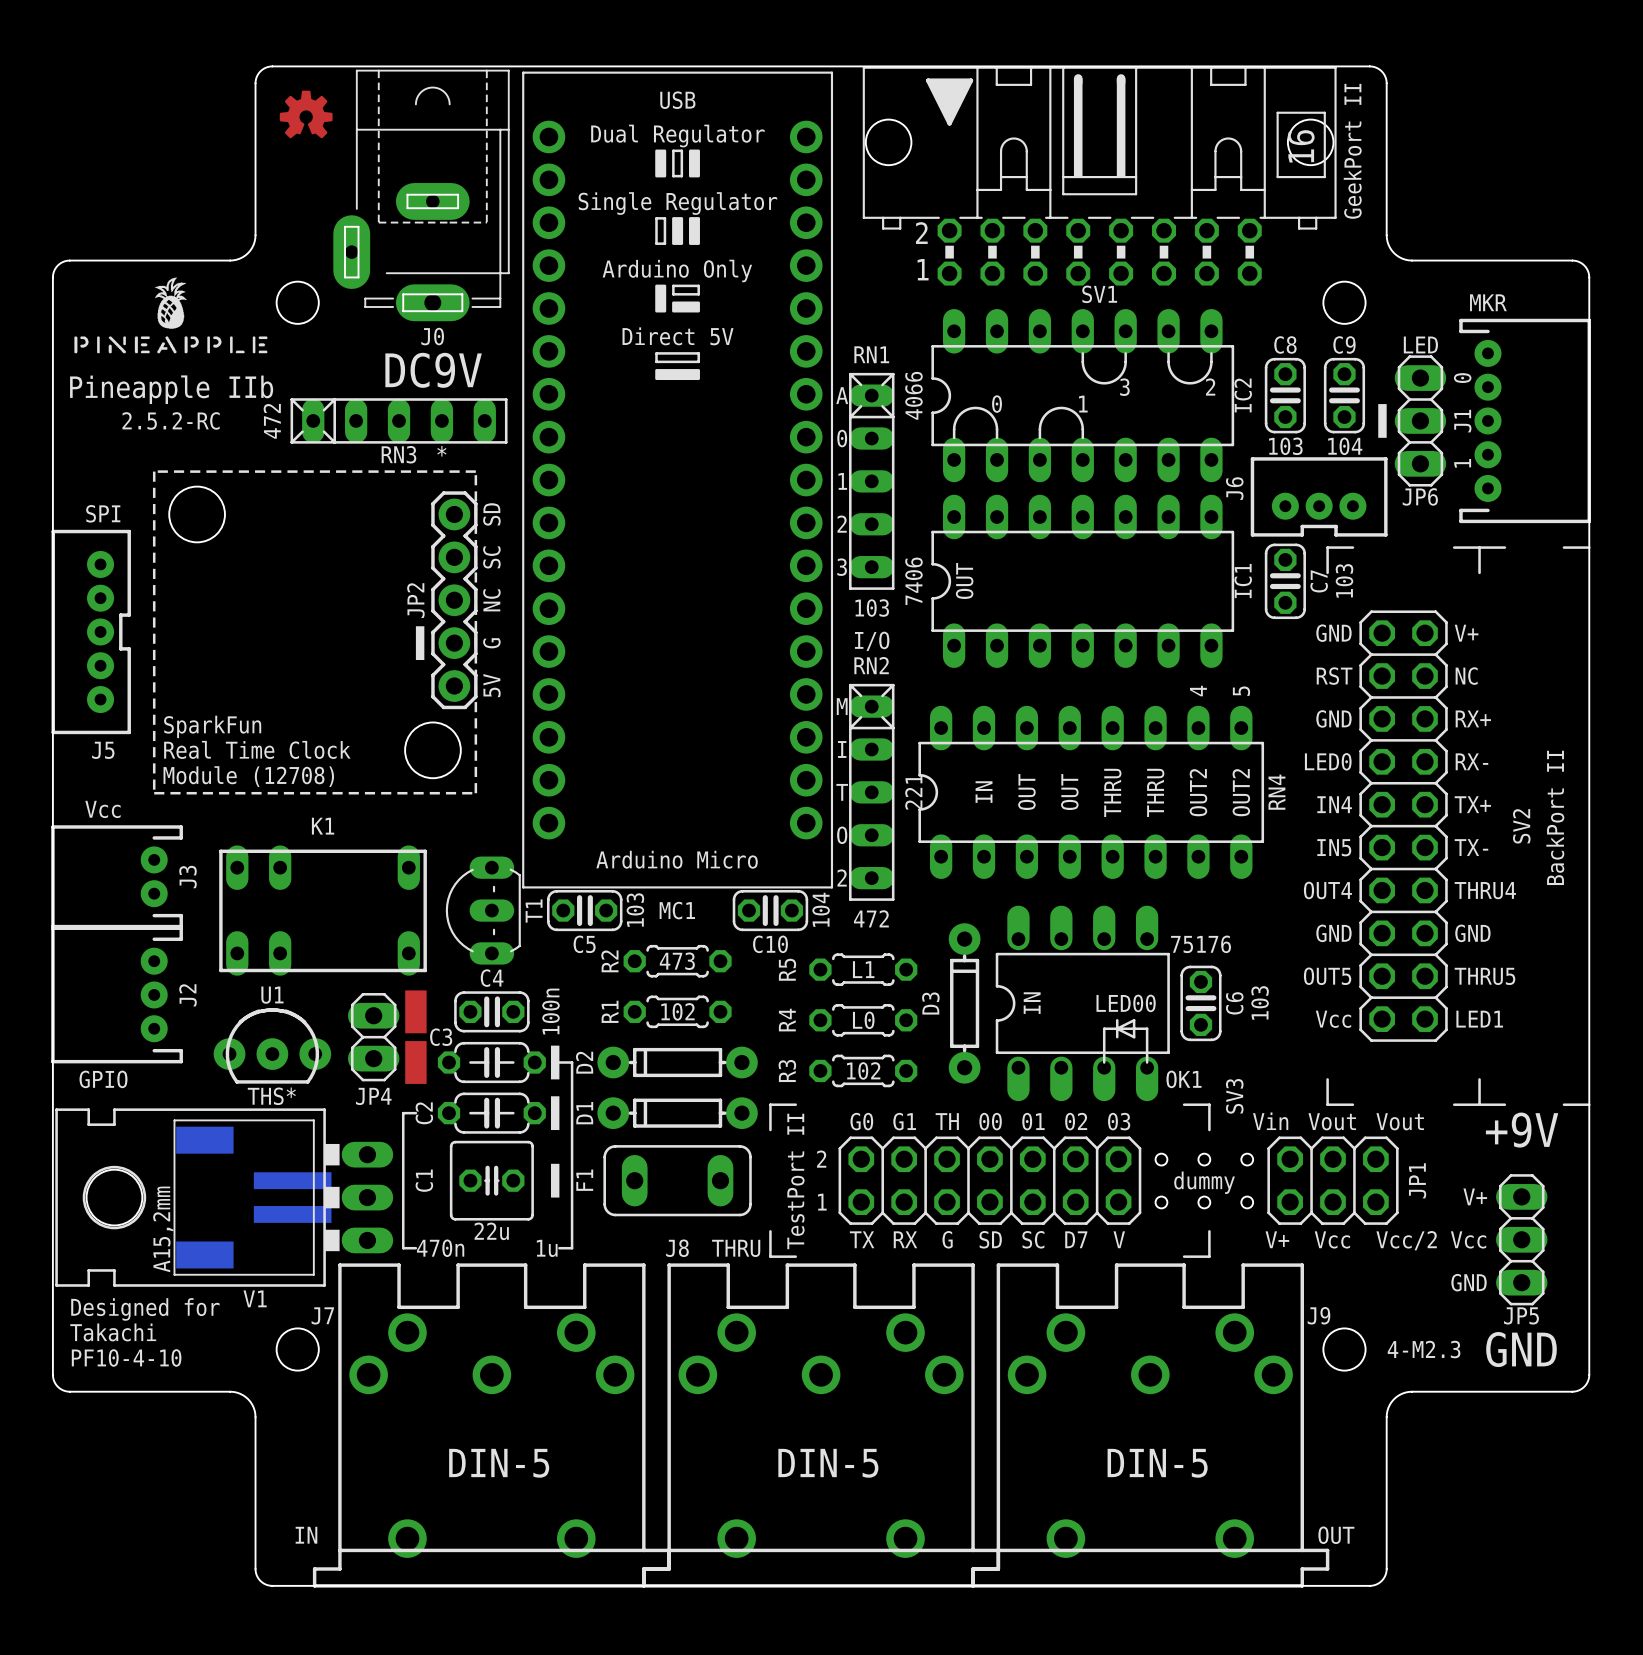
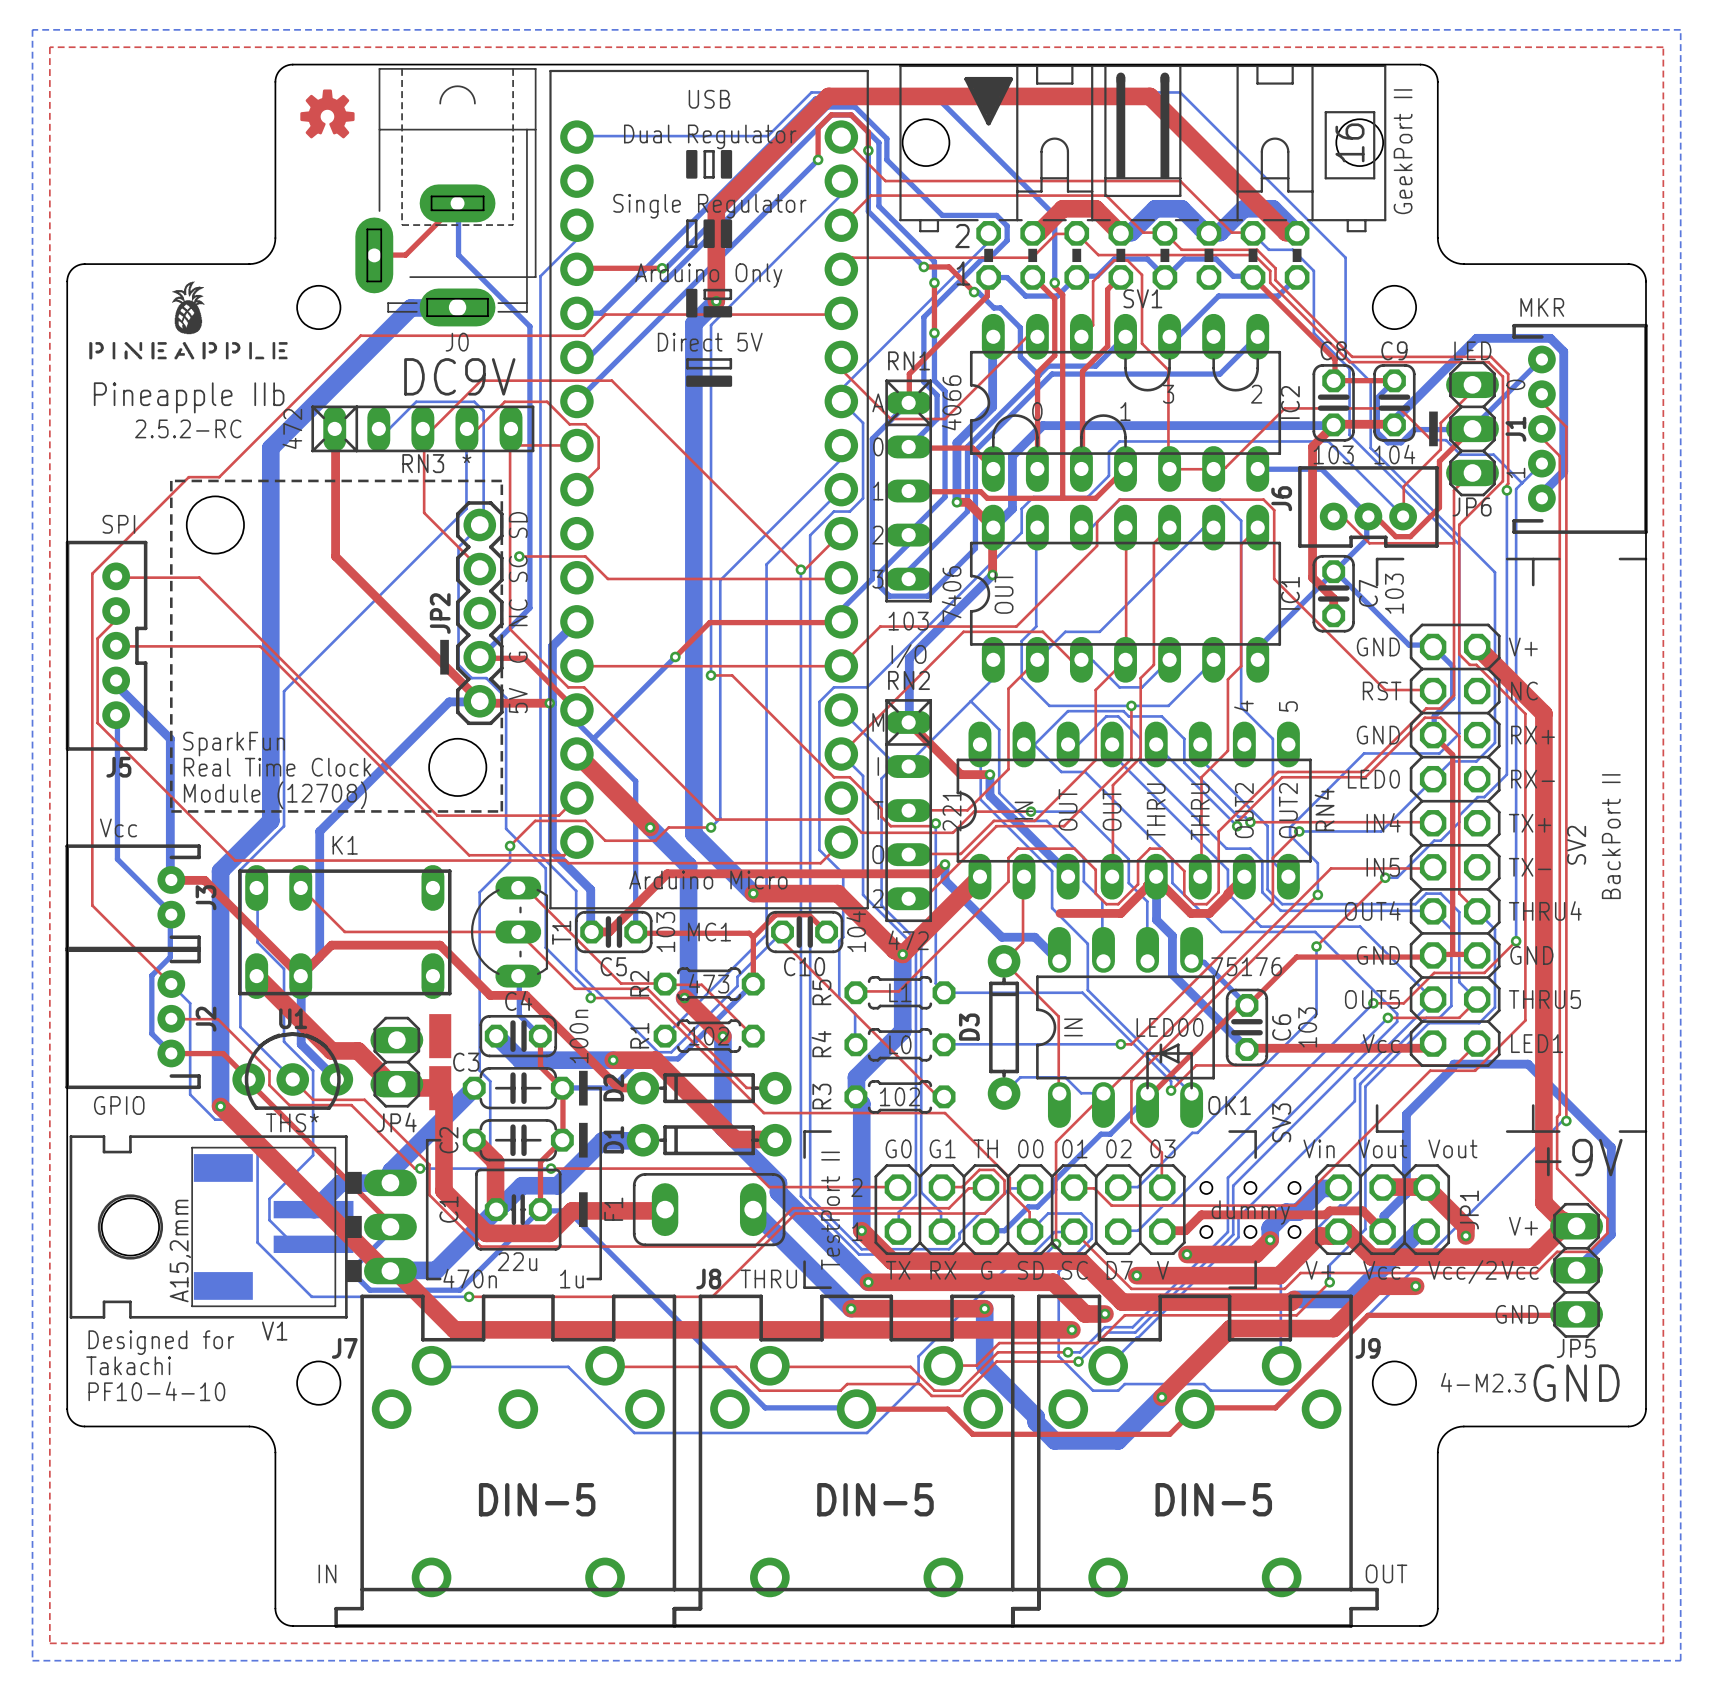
bottom zone outline: none -> (32, 29) (1680, 29) (1680, 1660) (32, 1660) (32, 29)
top zone outline: none -> (49, 47) (1663, 47) (1663, 1643) (49, 1643) (49, 47)
bottom track: none -> (576, 137) (767, 136) (811, 92) (1180, 92) (1345, 257) (1345, 356) (1370, 381) (1370, 448) (1494, 572) (1494, 742) (1476, 761) (1451, 761) (1381, 831) (1299, 831)
top track: none -> (841, 137) (885, 181) (1180, 181) (1231, 232) (1253, 233)
top track: none -> (868, 150) (868, 132) (851, 114) (831, 114) (818, 128) (818, 159)
bottom track: none -> (868, 150) (868, 211) (923, 266)
via: none -> (868, 150)
bottom track: none -> (818, 159) (576, 401)
via: none -> (818, 159)
bottom track: none -> (841, 181) (840, 195) (711, 325) (711, 675)
top track: none -> (457, 203) (405, 255) (374, 255)
bottom track: none -> (457, 203) (458, 255) (529, 326) (529, 608) (479, 657)
bottom track: none -> (576, 225) (576, 240) (540, 276) (540, 855) (576, 890) (576, 970) (658, 1052) (671, 1052) (737, 986) (737, 976) (782, 931)
top track: none -> (841, 225) (870, 195) (1106, 195) (1143, 232) (1164, 232) (1181, 249) (1257, 249) (1275, 268) (1275, 280) (1352, 356) (1491, 356) (1508, 374) (1506, 490)
bottom track: none -> (988, 233) (987, 243) (841, 388) (841, 401) (863, 422) (863, 498) (849, 511) (833, 511) (810, 535) (810, 1197) (861, 1249) (948, 1249) (959, 1238) (959, 1233) (979, 1213) (984, 1213) (1009, 1188) (1030, 1187)
top track: none -> (1032, 233) (1038, 232) (1062, 208) (1095, 208) (1120, 233)
bottom track: none -> (1120, 233) (1131, 232) (1155, 208) (1181, 208) (1208, 233) (1220, 232) (1243, 208) (1272, 208) (1297, 233)
bottom track: none -> (1253, 233) (1268, 249) (1292, 249) (1313, 270) (1313, 333) (1349, 368) (1349, 434) (1459, 544) (1459, 733) (1439, 753) (1364, 753) (1290, 827) (1290, 835) (1317, 863) (1317, 894)
top track: none -> (1297, 233) (1286, 232) (1149, 96) (828, 96) (716, 208) (716, 301)
top track: none -> (923, 266) (948, 266) (974, 292)
via: none -> (923, 266)
top track: none -> (662, 268) (576, 269)
bottom track: none -> (662, 268) (666, 268) (827, 107) (855, 107) (886, 138) (886, 159) (942, 215) (996, 215) (1007, 225) (1007, 240) (988, 259) (982, 259) (923, 317) (923, 381) (937, 395) (937, 419) (908, 446)
via: none -> (662, 268)
top track: none -> (841, 269) (852, 257) (1032, 257) (1056, 233) (1076, 233) (1098, 255) (1254, 255) (1270, 270) (1270, 282) (1349, 362) (1488, 362) (1502, 376) (1502, 481) (1459, 524) (1459, 654) (1469, 664) (1476, 664) (1525, 713) (1525, 1020) (1475, 1070) (1430, 1070) (1295, 1205) (1111, 1205) (1094, 1188) (1074, 1187)
top track: none -> (988, 277) (987, 296) (909, 374) (908, 402)
top track: none -> (1032, 277) (1054, 298) (1054, 355) (1037, 372) (1037, 468)
top track: none -> (1120, 277) (1107, 289) (1107, 346) (1082, 371) (1081, 468)
top track: none -> (1253, 277) (1335, 359) (1333, 380) (1394, 380)
bottom track: none -> (1253, 277) (1233, 276) (1216, 259) (1184, 259) (1164, 277) (1147, 259) (1114, 259) (1097, 276) (1077, 276) (1057, 296) (1025, 296) (1007, 277) (988, 277)
bottom track: none -> (1297, 277) (1278, 296) (1218, 296) (1179, 335) (1169, 336)
top track: none -> (934, 282) (934, 333)
bottom track: none -> (934, 282) (934, 261) (878, 206) (878, 142) (851, 114) (831, 114) (589, 356) (576, 357)
via: none -> (934, 282)
top track: none -> (1054, 282) (1054, 286) (1062, 294) (1062, 498)
bottom track: none -> (1054, 282) (1054, 215) (938, 99) (815, 99) (601, 313) (576, 313)
via: none -> (1054, 282)
bottom track: none -> (974, 292) (978, 292) (993, 307) (1000, 307) (1020, 327) (1020, 356) (1038, 375)
via: none -> (974, 292)
bottom track: none -> (716, 301) (693, 323) (693, 834) (753, 893)
via: none -> (716, 301)
bottom track: none -> (457, 307) (410, 307) (270, 448) (270, 820) (220, 871) (220, 1106)
top track: none -> (841, 313) (605, 314) (584, 335) (360, 335) (219, 477) (188, 477) (92, 573) (92, 905) (171, 984)
bottom track: none -> (934, 333) (934, 380) (945, 391) (945, 497) (909, 532) (908, 544) (880, 572) (880, 586) (889, 596) (927, 596) (975, 548) (975, 450) (1052, 374) (1220, 374) (1257, 336)
via: none -> (934, 333)
bottom track: none -> (993, 336) (992, 407) (956, 442) (956, 502)
top track: none -> (1037, 336) (1026, 337) (945, 419) (890, 419) (841, 370) (841, 357)
top track: none -> (1081, 336) (1093, 325) (1093, 281) (1114, 260) (1127, 260) (1142, 274) (1142, 343) (1168, 370) (1169, 468)
bottom track: none -> (1125, 336) (1095, 366) (1048, 366) (967, 446) (967, 511) (909, 569) (908, 579)
bottom track: none -> (1541, 359) (1472, 428) (1414, 429) (1401, 442) (1387, 442) (1377, 432) (1377, 397) (1394, 380)
top track: none -> (1472, 384) (1471, 392) (1440, 422) (1440, 449) (1403, 486) (1403, 516)
top track: none -> (1541, 394) (1542, 403) (1566, 426) (1566, 1120)
bottom track: none -> (908, 402) (872, 438) (872, 578) (841, 609) (841, 621)
bottom track: none -> (1333, 424) (1042, 425) (1012, 456) (1012, 508) (993, 527)
top track: none -> (1394, 424) (1333, 424) (1312, 446) (1312, 577) (1333, 598) (1333, 615)
bottom track: none -> (1394, 424) (1394, 420) (1476, 338) (1550, 338) (1563, 351) (1563, 471) (1542, 493) (1541, 498)
top track: none -> (334, 428) (335, 556) (479, 701) (483, 703) (549, 703)
bottom track: none -> (378, 428) (389, 428) (416, 401) (474, 401) (483, 411) (483, 522) (458, 547) (458, 664) (471, 678) (486, 678) (506, 697) (506, 828) (545, 868) (545, 947) (590, 992) (590, 998)
top track: none -> (466, 428) (478, 428) (504, 401) (547, 401) (569, 424) (585, 424) (598, 437) (598, 467) (576, 489)
bottom track: none -> (466, 428) (466, 508) (284, 691) (284, 826) (240, 869) (240, 1027) (292, 1079)
top track: none -> (1472, 428) (1439, 461) (1439, 507) (1410, 536) (1395, 536) (1376, 516) (1368, 516)
top track: none -> (1541, 428) (1542, 438) (1559, 456) (1559, 1114) (1557, 1117) (1557, 1168) (1607, 1218) (1607, 1233) (1588, 1251) (1557, 1251) (1535, 1273) (1300, 1273) (1284, 1288) (1131, 1288) (1074, 1231)
top track: none -> (1431, 440) (1399, 408) (1284, 408) (1225, 467) (1169, 469)
bottom track: none -> (1431, 440) (1446, 440) (1460, 454) (1493, 454) (1522, 483)
top track: none -> (576, 445) (576, 445) (510, 445) (511, 428) (510, 429) (510, 629) (568, 687) (584, 687) (716, 819) (848, 819) (861, 832) (952, 832) (974, 811) (1030, 811)
bottom track: none -> (841, 445) (840, 459) (720, 580) (720, 818) (711, 827)
top track: none -> (908, 446) (972, 448) (993, 468)
bottom track: none -> (1541, 463) (1516, 489) (1516, 941)
top track: none -> (1125, 468) (1095, 498) (987, 498) (980, 491) (908, 491)
bottom track: none -> (1257, 468) (1321, 469) (1368, 515) (1366, 539) (1333, 571)
top track: none -> (1472, 472) (1454, 490) (1454, 695) (1440, 708) (1426, 708) (1362, 771) (1278, 771) (1218, 831) (1218, 892) (1206, 904) (1193, 904) (1184, 894) (1184, 871) (1161, 848) (1149, 848) (1138, 860) (1138, 884) (1118, 904) (1106, 904) (1095, 893) (1095, 869) (1074, 848) (1017, 848) (1008, 857) (1008, 881) (898, 991) (855, 992)
bottom track: none -> (841, 489) (766, 564) (766, 934) (665, 1036)
bottom track: none -> (1506, 490) (1506, 774) (1484, 797) (1477, 797) (1459, 815) (1459, 822) (1440, 840) (1434, 840) (1397, 877) (1385, 877)
via: none -> (1506, 490)
top track: none -> (956, 502) (967, 502) (993, 527) (992, 575)
via: none -> (956, 502)
top track: none -> (1333, 516) (1342, 516) (1369, 543) (1454, 543)
bottom track: none -> (1403, 516) (1328, 441) (1119, 441) (1108, 452) (1108, 475) (1087, 497) (1033, 497) (1021, 508) (1021, 532) (867, 687) (833, 687) (819, 701) (819, 849) (843, 873) (843, 937) (839, 941) (839, 998) (855, 1013) (855, 1044)
bottom track: none -> (1037, 527) (1036, 626) (1021, 641) (1021, 678) (1049, 705) (1168, 705) (1213, 659)
bottom track: none -> (1081, 527) (1091, 527) (1119, 499) (1220, 499) (1241, 520) (1241, 707) (1272, 738) (1272, 861) (1288, 876)
top track: none -> (1125, 527) (1126, 659) (1095, 690) (1095, 760) (1034, 820) (993, 820) (960, 853) (908, 854)
top track: none -> (1169, 527) (1153, 543) (1153, 664) (1140, 678) (1140, 757) (1112, 785) (1112, 876)
bottom track: none -> (1213, 527) (1202, 528) (1099, 631) (1065, 631) (1037, 659)
top track: none -> (1257, 527) (1241, 544) (1241, 666) (1227, 679) (1227, 750) (1201, 777) (1200, 876)
top track: none -> (841, 533) (804, 569) (800, 569) (611, 380) (481, 380) (432, 429) (422, 428) (424, 512) (479, 569)
top track: none -> (519, 556) (585, 556) (607, 578) (841, 577)
via: none -> (519, 556)
bottom track: none -> (800, 569) (800, 1196) (859, 1254) (1032, 1254) (1054, 1232) (1074, 1231)
via: none -> (800, 569)
bottom track: none -> (1333, 571) (1258, 647) (1257, 659)
bottom track: none -> (1333, 571) (1409, 645) (1431, 645) (1452, 666) (1452, 697) (1434, 716) (1433, 735)
bottom track: none -> (992, 575) (909, 658) (908, 722)
via: none -> (992, 575)
top track: none -> (116, 576) (199, 577) (437, 815) (559, 815) (576, 798)
top track: none -> (116, 611) (116, 619) (97, 638) (97, 723) (235, 860) (820, 863) (841, 842)
bottom track: none -> (576, 621) (552, 646) (552, 851) (590, 889) (591, 932)
top track: none -> (841, 621) (709, 622) (675, 656)
top track: none -> (116, 645) (260, 646) (469, 855) (564, 855) (576, 842)
top track: none -> (1477, 646) (1543, 713) (1543, 1202) (1559, 1218) (1576, 1226) (1563, 1226) (1533, 1257) (1372, 1257) (1346, 1232) (1338, 1231) (1331, 1236) (1319, 1236) (1279, 1275) (1136, 1275)
bottom track: none -> (675, 656) (593, 738)
via: none -> (675, 656)
top track: none -> (479, 657) (524, 658) (576, 709)
bottom track: none -> (993, 659) (992, 679) (908, 764) (908, 766)
top track: none -> (1037, 659) (1008, 688) (1008, 769) (967, 810) (908, 810)
top track: none -> (1081, 659) (1070, 659) (1042, 631) (963, 631) (841, 754)
bottom track: none -> (1081, 659) (1093, 660) (1119, 687) (1142, 687) (1169, 659)
top track: none -> (576, 665) (840, 666) (880, 626) (1016, 626) (1097, 545) (1097, 522) (1119, 499) (1263, 499) (1274, 510) (1274, 578) (1385, 690) (1433, 691)
top track: none -> (711, 675) (732, 675) (833, 777) (849, 777) (881, 808) (881, 816) (890, 826) (933, 826) (935, 823)
via: none -> (711, 675)
bottom track: none -> (116, 680) (117, 686) (170, 738) (171, 879)
bottom track: none -> (970, 701) (999, 729) (999, 793) (1026, 820) (1046, 820) (1083, 857) (1083, 881) (1102, 900) (1103, 961)
bottom track: none -> (479, 701) (449, 701) (319, 831) (319, 957) (300, 976) (301, 1044) (336, 1079)
via: none -> (549, 703)
top track: none -> (1131, 705) (1131, 758) (1064, 826) (996, 826) (925, 897) (908, 898)
via: none -> (1131, 705)
bottom track: none -> (576, 709) (577, 723) (635, 781) (635, 931)
bottom track: none -> (841, 709) (896, 765) (908, 766)
bottom track: none -> (116, 715) (117, 859) (171, 914) (170, 957) (151, 975) (151, 1033) (171, 1053)
top track: none -> (908, 722) (960, 774) (989, 774)
top track: none -> (1433, 735) (1452, 754) (1452, 954)
bottom track: none -> (979, 744) (980, 799) (1052, 871) (1052, 908) (1087, 943) (1087, 990) (1191, 1093)
bottom track: none -> (1068, 744) (1078, 744) (1106, 716) (1118, 716) (1140, 738) (1140, 762) (1226, 848) (1250, 848) (1262, 860) (1262, 892) (1280, 910) (1432, 910) (1451, 929) (1451, 1005) (1439, 1017) (1426, 1017) (1360, 1083) (1360, 1191) (1345, 1205) (1340, 1205) (1280, 1265) (1281, 1365)
bottom track: none -> (1112, 744) (1112, 754) (1227, 869) (1227, 893) (1260, 926) (1360, 926) (1432, 999)
bottom track: none -> (1156, 744) (1237, 826)
bottom track: none -> (1200, 744) (1201, 760) (1267, 826) (1267, 889) (1282, 904) (1415, 904) (1426, 893) (1440, 893) (1459, 912) (1459, 982) (1477, 999)
top track: none -> (576, 754) (650, 827)
bottom track: none -> (841, 754) (863, 775) (863, 894) (915, 947) (915, 1195) (898, 1212) (897, 1231)
bottom track: none -> (908, 766) (894, 765) (881, 778) (881, 905) (921, 945) (921, 1192) (941, 1212) (941, 1231)
bottom track: none -> (989, 774) (989, 795) (1067, 873) (1067, 876)
via: none -> (989, 774)
bottom track: none -> (1030, 811) (1081, 811) (1128, 859) (1128, 883) (1147, 901) (1147, 961)
via: none -> (1030, 811)
top track: none -> (1250, 822) (1433, 823)
bottom track: none -> (1250, 822) (1245, 816) (1238, 816) (1184, 762) (1184, 738) (1161, 716) (1128, 716) (1123, 711) (1067, 711) (1034, 744) (1024, 744) (1024, 744) (1033, 744) (1061, 771) (1085, 771) (1172, 859) (1172, 883) (1221, 931) (1315, 931) (1397, 1013) (1397, 1021) (1233, 1185) (1233, 1234) (1135, 1332) (1107, 1332) (1078, 1361)
via: none -> (1250, 822)
bottom track: none -> (935, 823) (935, 983) (944, 992) (1082, 992) (1171, 1081) (1171, 1090)
via: none -> (935, 823)
top track: none -> (1237, 826) (1237, 822) (1282, 777) (1365, 777) (1424, 717) (1440, 717) (1459, 736) (1459, 893) (1477, 911)
via: none -> (1237, 826)
bottom track: none -> (650, 827) (688, 865) (688, 994) (684, 998)
via: none -> (650, 827)
top track: none -> (711, 827) (668, 827) (655, 840) (605, 840) (585, 820) (535, 820) (510, 846)
via: none -> (711, 827)
top track: none -> (1299, 831) (1272, 857) (1272, 902) (1131, 1044) (1120, 1044)
via: none -> (1299, 831)
bottom track: none -> (510, 846) (510, 861) (479, 892) (479, 1070) (490, 1081) (490, 1168)
via: none -> (510, 846)
top track: none -> (945, 864) (935, 873) (667, 873) (609, 931) (591, 932)
bottom track: none -> (945, 864) (945, 880) (1001, 937) (1034, 937) (1059, 961)
via: none -> (945, 864)
top track: none -> (1433, 867) (1331, 868) (1106, 1093) (1103, 1093) (1056, 1142) (1056, 1243)
top track: none -> (979, 876) (902, 954) (894, 950) (837, 893) (753, 893)
top track: none -> (1024, 876) (1023, 942) (1004, 961) (1058, 1016) (1059, 1093)
bottom track: none -> (1156, 876) (1156, 920) (1172, 935) (1172, 974) (1246, 1049)
top track: none -> (1244, 876) (1209, 913) (1190, 913) (1156, 876) (1120, 913) (1060, 913)
top track: none -> (1385, 877) (1316, 946)
via: none -> (1385, 877)
top track: none -> (171, 879) (204, 880) (300, 976) (331, 945) (440, 945) (490, 995) (525, 995) (618, 1087) (643, 1088)
bottom track: none -> (256, 887) (257, 942) (284, 968) (284, 1041) (313, 1070) (313, 1155) (269, 1198) (269, 1220) (293, 1243) (313, 1244)
top track: none -> (300, 887) (344, 931) (518, 931)
top track: none -> (518, 887) (525, 888) (621, 983) (701, 984) (753, 1036)
via: none -> (753, 893)
top track: none -> (1317, 894) (1131, 1081) (1131, 1122) (1161, 1152) (1162, 1187)
via: none -> (1317, 894)
bottom track: none -> (1477, 911) (1494, 929) (1494, 1007) (1479, 1023) (1428, 1023) (1365, 1086) (1365, 1229) (1329, 1265) (1329, 1282)
top track: none -> (518, 932) (574, 988) (647, 988) (746, 1087) (775, 1088)
top track: none -> (635, 932) (749, 933) (753, 937)
top track: none -> (782, 932) (783, 942) (937, 1095) (944, 1096)
top track: none -> (826, 932) (808, 914) (775, 914) (753, 937)
top track: none -> (753, 937) (753, 984)
top track: none -> (1516, 941) (1484, 972) (1434, 972) (1403, 1003) (1373, 1003)
via: none -> (1516, 941)
bottom track: none -> (1316, 946) (1316, 1013) (1197, 1132) (1192, 1132) (1138, 1187) (1118, 1187)
via: none -> (1316, 946)
bottom track: none -> (902, 954) (902, 1031) (856, 1077) (855, 1096) (861, 1103) (861, 1230)
via: none -> (902, 954)
top track: none -> (1477, 955) (1296, 957) (1249, 1004) (1239, 1005) (1152, 1093) (1147, 1093)
bottom track: none -> (1191, 961) (1204, 962) (1246, 1005)
top track: none -> (256, 976) (331, 1050) (358, 1050) (388, 1081) (396, 1084) (400, 1087) (440, 1087)
bottom track: none -> (518, 976) (519, 1015) (540, 1036)
bottom track: none -> (171, 984) (190, 1003) (190, 1094) (215, 1119) (224, 1119) (257, 1152) (257, 1242) (311, 1296) (469, 1296)
bottom track: none -> (753, 984) (677, 1058) (640, 1058) (611, 1087) (562, 1088)
top track: none -> (590, 998) (648, 998) (763, 1113) (945, 1113) (1009, 1177) (1009, 1192) (1029, 1212) (1030, 1231)
via: none -> (590, 998)
top track: none -> (684, 998) (722, 1036)
via: none -> (684, 998)
bottom track: none -> (1433, 999) (1354, 1078) (1354, 1101) (1238, 1217) (1238, 1237) (1108, 1365)
top track: none -> (1477, 999) (1459, 1017) (1387, 1017)
bottom track: none -> (1373, 1003) (1171, 1205) (1163, 1205) (1138, 1230) (1118, 1231)
via: none -> (1373, 1003)
top track: none -> (171, 1018) (217, 1019) (269, 1070) (269, 1085) (289, 1105) (351, 1105) (414, 1168) (420, 1168)
bottom track: none -> (1387, 1017) (1227, 1177) (1227, 1232) (1132, 1327) (1104, 1327) (1079, 1352) (1067, 1352)
via: none -> (1387, 1017)
bottom track: none -> (496, 1036) (520, 1060) (613, 1060)
top track: none -> (540, 1036) (540, 1066) (562, 1089) (562, 1138) (540, 1161) (540, 1209)
bottom track: none -> (722, 1036) (722, 1127) (778, 1183) (778, 1192) (868, 1282)
via: none -> (722, 1036)
bottom track: none -> (1120, 1044) (944, 1044)
via: none -> (1120, 1044)
top track: none -> (1433, 1043) (1428, 1048) (1246, 1049)
top track: none -> (1477, 1043) (1455, 1065) (1196, 1065) (1171, 1090)
top track: none -> (171, 1053) (223, 1053) (249, 1080) (249, 1082) (389, 1222) (390, 1226)
top track: none -> (613, 1060) (655, 1060) (734, 1139) (775, 1140)
via: none -> (613, 1060)
top track: none -> (292, 1079) (313, 1099) (364, 1099) (429, 1164) (429, 1195) (481, 1246) (754, 1246) (792, 1208) (948, 1208) (968, 1188) (986, 1187)
top track: none -> (440, 1088) (443, 1095) (443, 1191) (486, 1233) (549, 1233) (572, 1210) (665, 1209)
bottom track: none -> (474, 1088) (391, 1171) (390, 1182) (340, 1183) (313, 1209)
via: none -> (1171, 1090)
bottom track: none -> (1004, 1093) (1020, 1077) (1065, 1077) (1081, 1093) (1103, 1093)
bottom track: none -> (1147, 1093) (1147, 1097) (1110, 1134) (1101, 1134) (1054, 1180) (1054, 1189) (1037, 1206) (1028, 1206) (1004, 1230) (986, 1231)
top track: none -> (220, 1106) (384, 1270) (399, 1274) (454, 1329) (1071, 1329)
via: none -> (220, 1106)
bottom track: none -> (1566, 1120) (1562, 1120) (1292, 1390) (1210, 1390) (1204, 1384) (1124, 1384) (1118, 1390) (1093, 1390) (1058, 1356) (1058, 1271) (1091, 1238) (1091, 1224) (1081, 1213) (1048, 1213) (1030, 1231)
via: none -> (1566, 1120)
top track: none -> (474, 1140) (495, 1161) (496, 1209)
bottom track: none -> (643, 1140) (602, 1140) (557, 1185) (521, 1185) (436, 1270) (390, 1271)
bottom track: none -> (420, 1168) (551, 1168)
via: none -> (420, 1168)
top track: none -> (551, 1168) (750, 1168) (769, 1187) (897, 1187)
via: none -> (551, 1168)
top track: none -> (941, 1187) (962, 1187) (979, 1169) (993, 1169) (1004, 1180) (1004, 1193) (984, 1213) (795, 1213) (712, 1296) (469, 1296)
bottom track: none -> (1338, 1187) (1321, 1188) (1298, 1212) (1286, 1212) (1270, 1228) (1270, 1239)
top track: none -> (1382, 1187) (1426, 1187) (1465, 1226) (1465, 1236)
bottom track: none -> (753, 1209) (851, 1308)
bottom track: none -> (390, 1226) (389, 1232) (358, 1263) (358, 1278) (369, 1290) (459, 1290) (540, 1209) (568, 1210) (765, 1407) (856, 1409)
top track: none -> (861, 1230) (892, 1261) (1081, 1261) (1122, 1302) (1291, 1302) (1294, 1299)
via: none -> (861, 1230)
top track: none -> (1162, 1231) (1185, 1230) (1201, 1214) (1325, 1214) (1329, 1210) (1362, 1210) (1382, 1231)
bottom track: none -> (1382, 1231) (1383, 1216) (1406, 1193) (1406, 1114) (1452, 1068) (1454, 1064) (1528, 1064) (1611, 1147) (1611, 1234) (1576, 1270)
bottom track: none -> (1426, 1231) (1418, 1232) (1350, 1299) (1294, 1299)
via: none -> (1465, 1236)
top track: none -> (1270, 1239) (1255, 1254) (1186, 1254)
via: none -> (1270, 1239)
bottom track: none -> (1056, 1243) (1040, 1259) (1015, 1259) (918, 1356) (918, 1381) (867, 1432) (634, 1432) (568, 1366) (431, 1365)
via: none -> (1056, 1243)
via: none -> (1186, 1254)
via: none -> (1136, 1275)
top track: none -> (868, 1282) (1053, 1282) (1085, 1314) (1104, 1314)
via: none -> (868, 1282)
top track: none -> (1329, 1282) (1296, 1315) (1124, 1315) (1097, 1343) (999, 1343) (976, 1365) (943, 1365)
via: none -> (1329, 1282)
top track: none -> (1415, 1286) (1376, 1286) (1333, 1328) (1230, 1328) (1161, 1397)
via: none -> (1415, 1286)
via: none -> (469, 1296)
top track: none -> (851, 1308) (984, 1308)
via: none -> (851, 1308)
bottom track: none -> (984, 1308) (984, 1365) (1036, 1417) (1036, 1422) (1054, 1440) (1118, 1440) (1161, 1397)
via: none -> (984, 1308)
via: none -> (1104, 1314)
top track: none -> (1576, 1314) (1368, 1315) (1275, 1407) (1196, 1407) (1169, 1434) (972, 1434) (947, 1409) (856, 1409)
via: none -> (1071, 1329)
top track: none -> (1067, 1352) (997, 1352) (959, 1390) (934, 1390) (910, 1366) (769, 1365)
via: none -> (1067, 1352)
top track: none -> (1078, 1361) (996, 1361) (962, 1395) (931, 1395) (919, 1384) (847, 1384) (840, 1390) (759, 1390) (736, 1366) (605, 1365)
via: none -> (1078, 1361)
via: none -> (1161, 1397)

